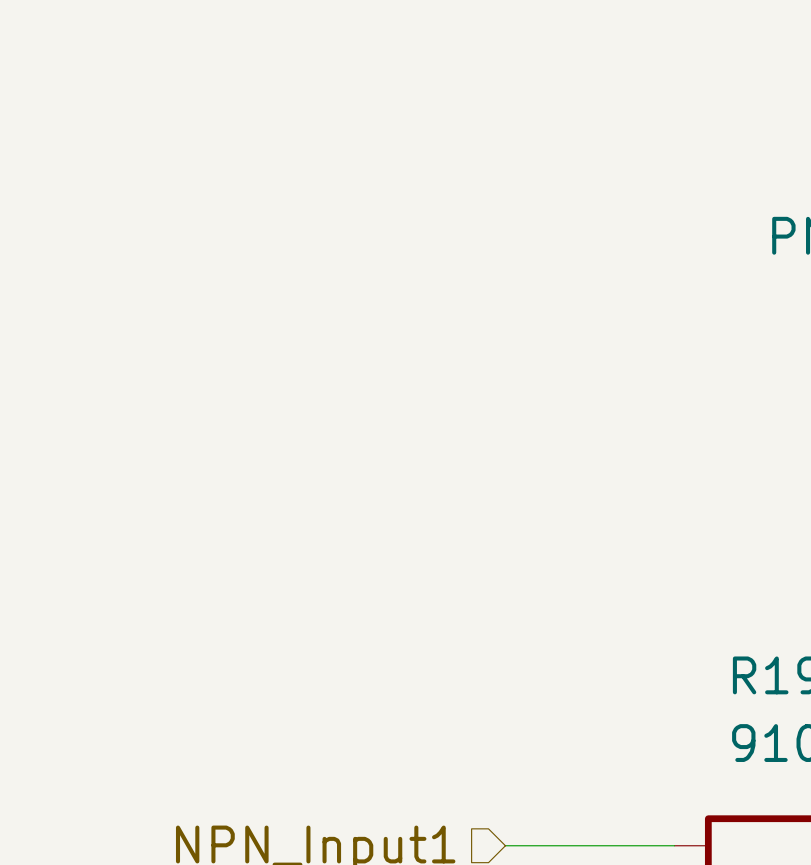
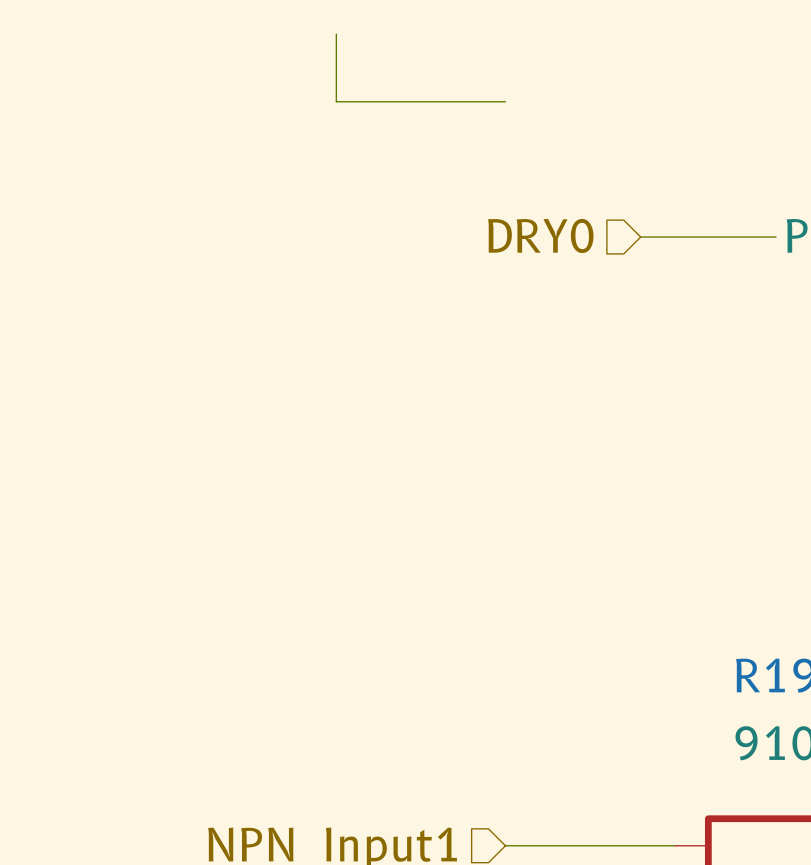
wire: none -> (336, 34) (336, 101) (505, 101)
hierarchical label: none -> DRY0 (540, 235)
wire: none -> (640, 237) (775, 237)

